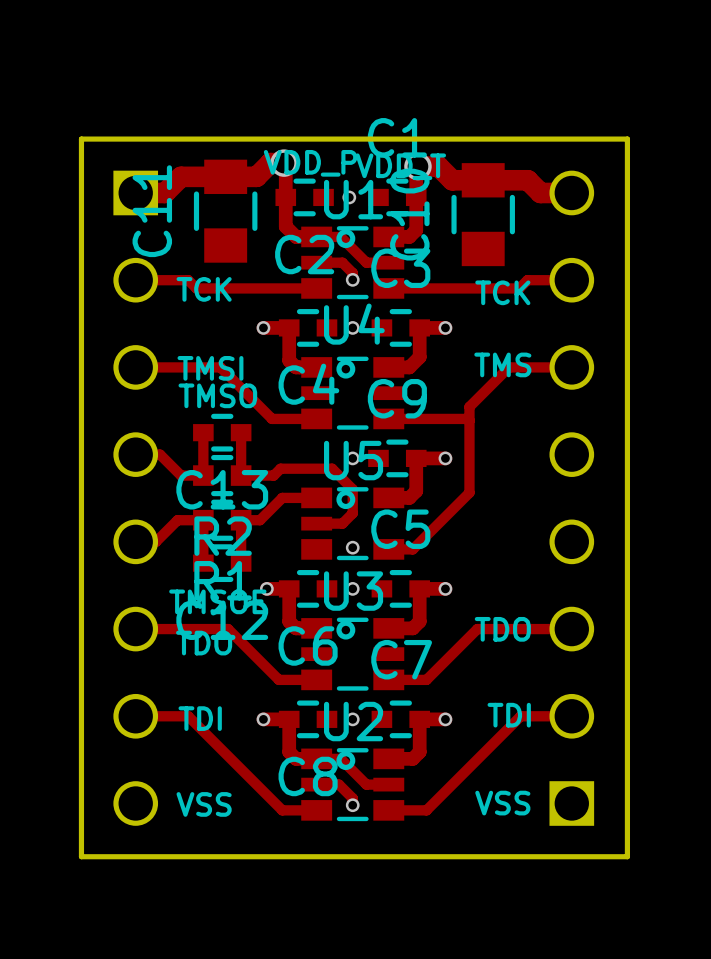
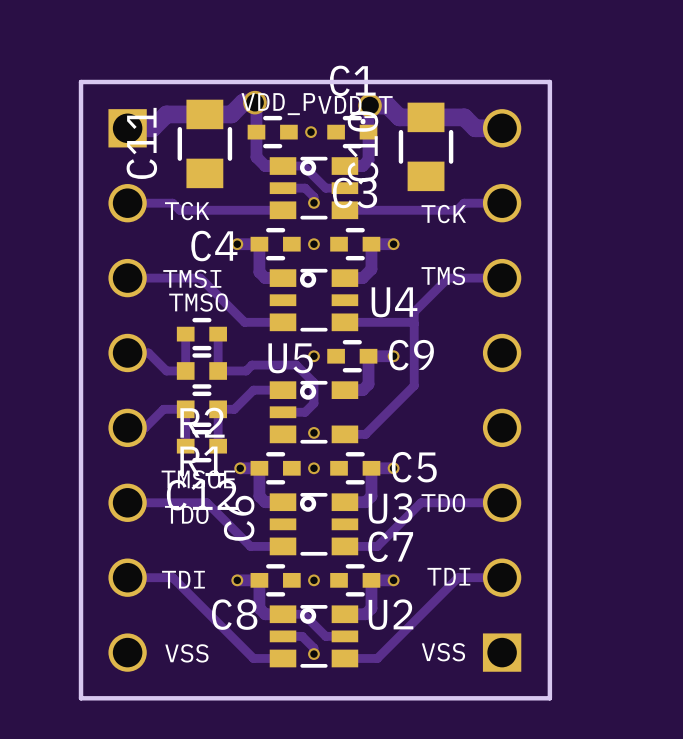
U1 name: U1 (353, 199) -> none
C2 name: C2 (304, 254) -> none
U4 name position: U4 (354, 324) -> U4 (394, 302)
C4 name position: C4 (308, 384) -> C4 (214, 246)
C9 name position: C9 (397, 398) -> C9 (411, 355)
U5 name position: U5 (353, 460) -> U5 (290, 358)
C13 name: C13 (222, 489) -> none
C5 name position: C5 (400, 529) -> C5 (414, 467)
U3 name position: U3 (353, 591) -> U3 (390, 508)
C6 name rotation: 0° (308, 645) -> 90° counterclockwise (239, 518)
C7 name position: C7 (401, 659) -> C7 (390, 546)
U2 name position: U2 (353, 721) -> U2 (391, 614)
C8 name position: C8 (308, 776) -> C8 (234, 614)

